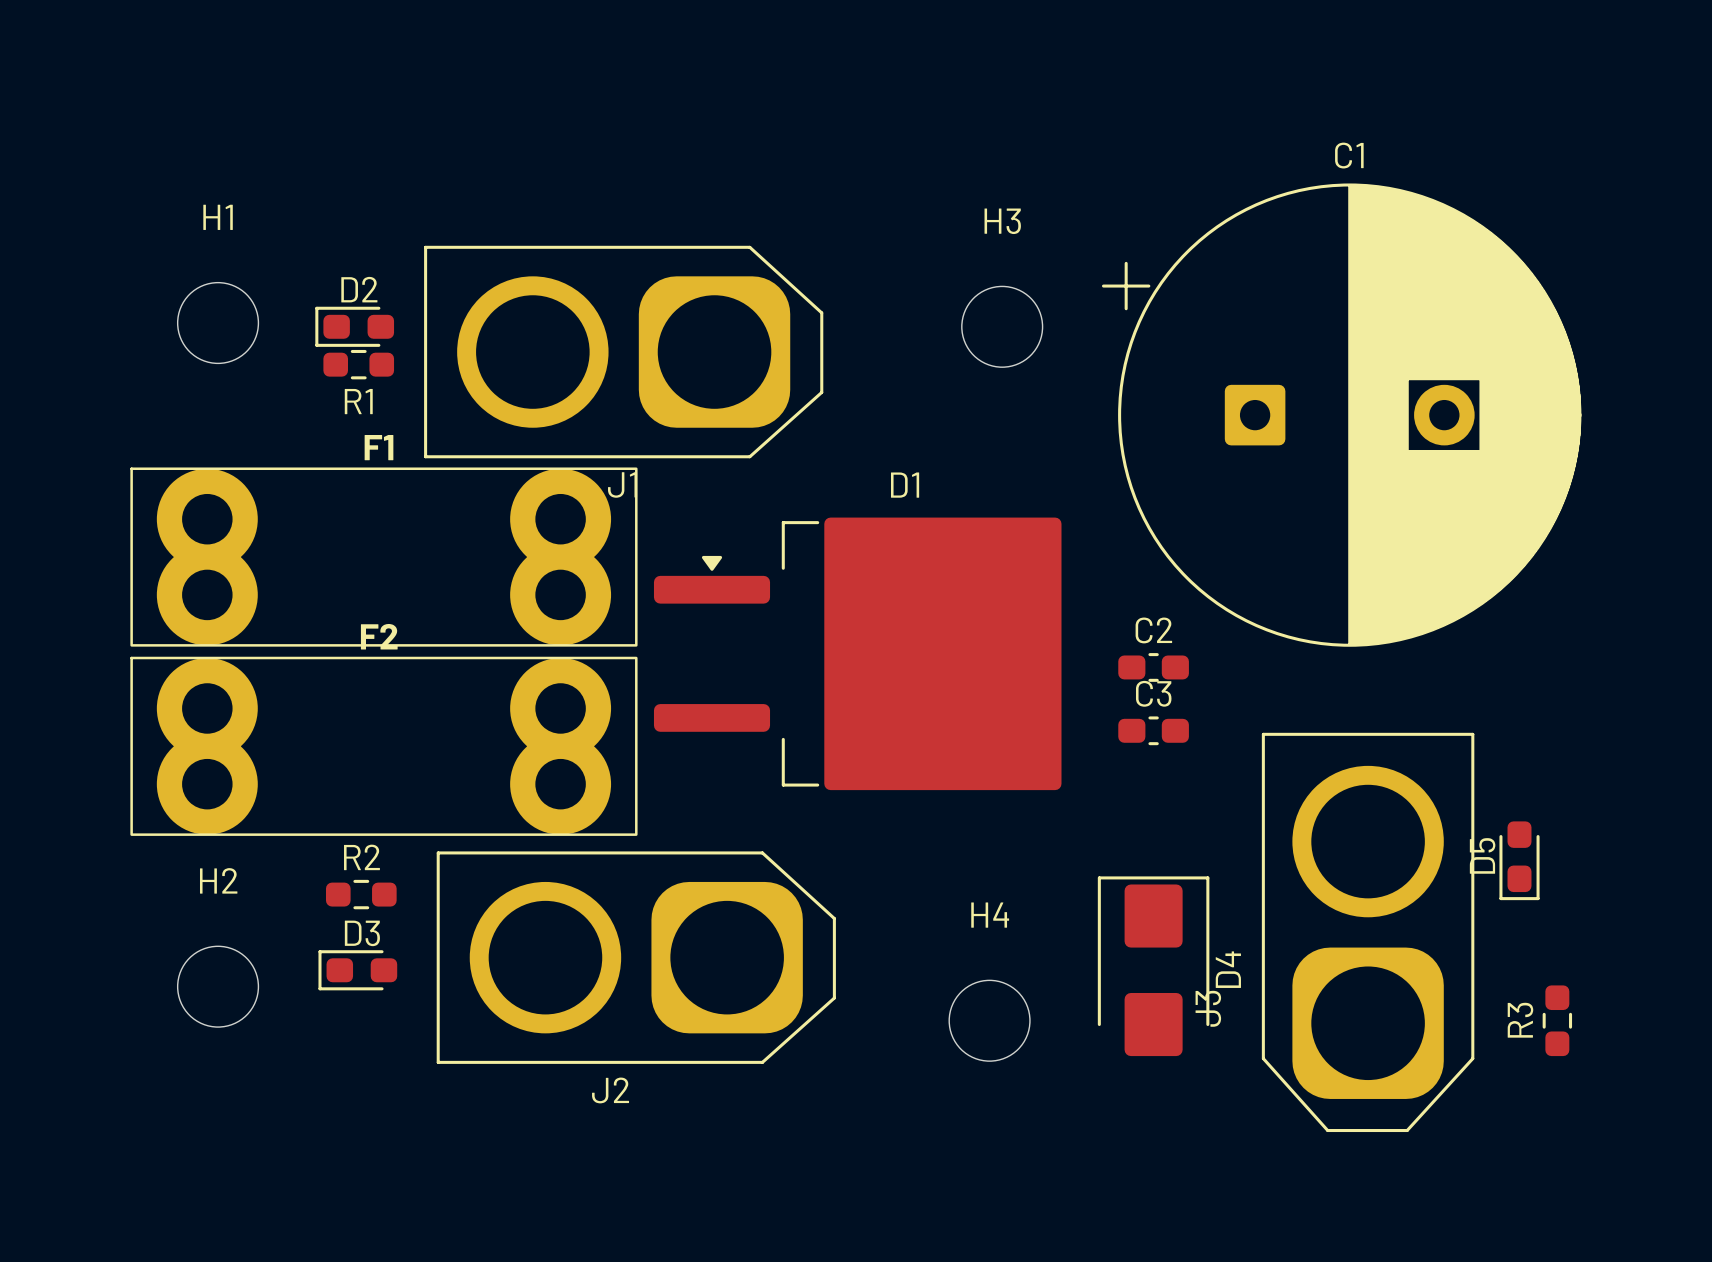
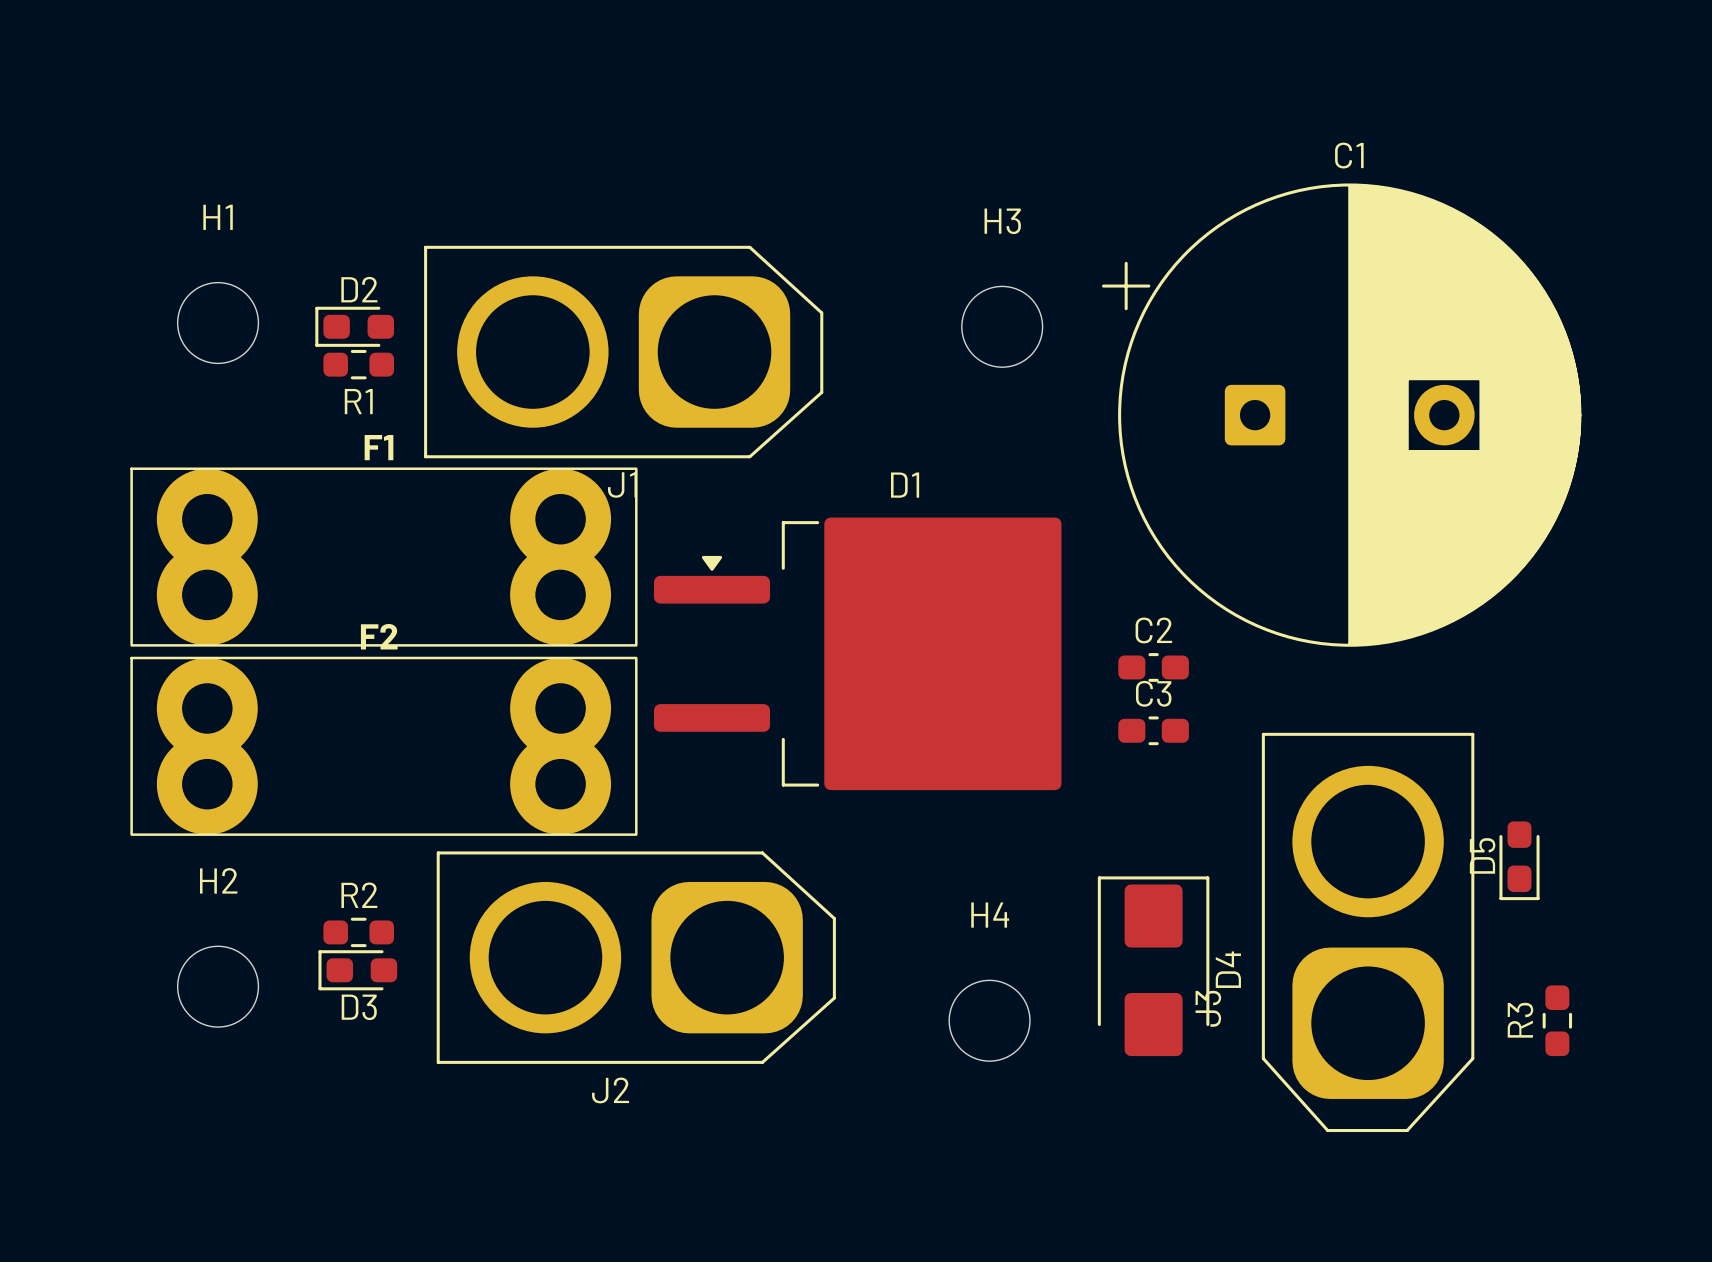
R2 position: (361, 894) -> (358, 932)
D3 name position: D3 (362, 933) -> D3 (359, 1007)

